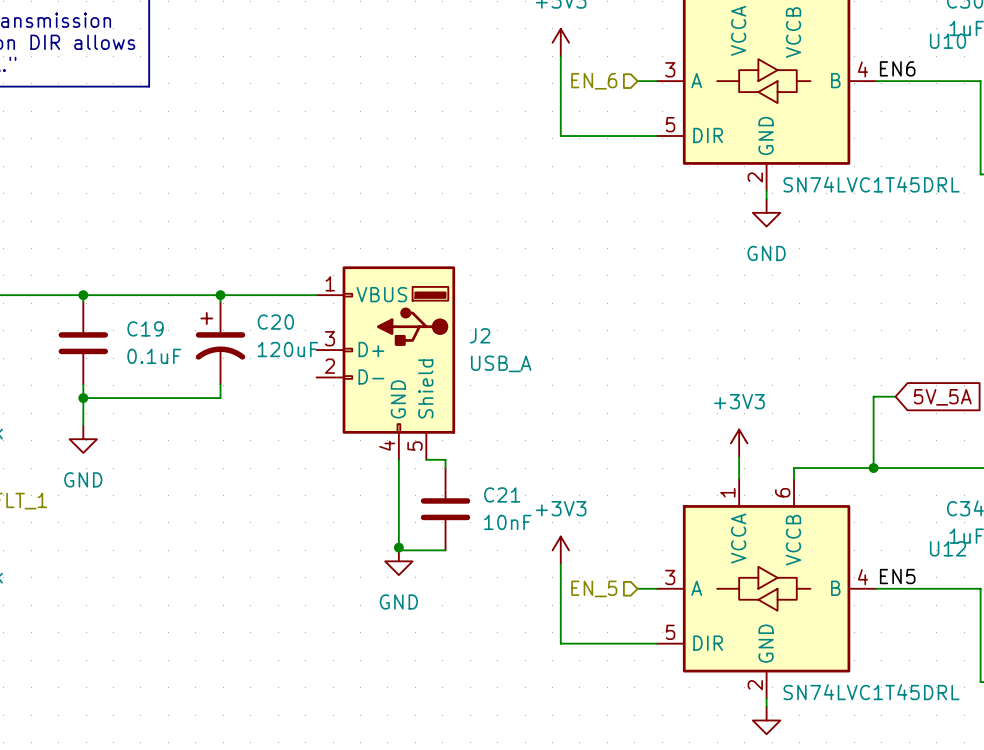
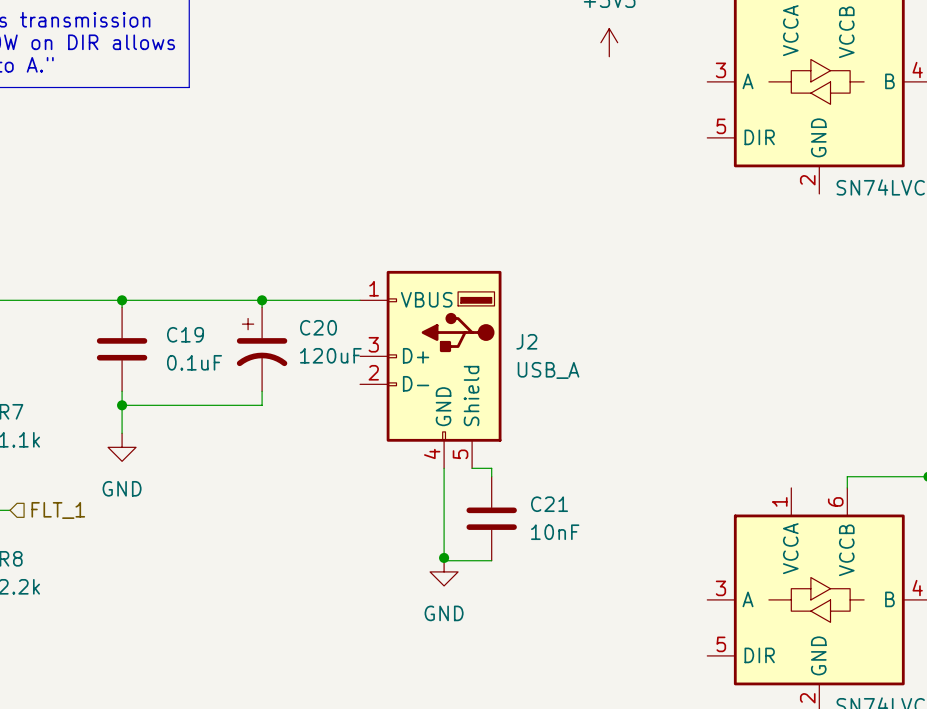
wire: (560, 56) (560, 136) (656, 136) -> none
hierarchical label: EN_6 (594, 81) -> none
wire: (637, 81) (656, 81) -> none
wire: (766, 190) (766, 199) -> none
power symbol: GND (766, 212) -> none
power symbol: +3V3 (739, 443) -> none
wire: (739, 457) (739, 479) -> none
power symbol: +3V3 (560, 550) -> none
wire: (560, 564) (560, 643) (656, 643) -> none
hierarchical label: EN_5 (594, 588) -> none
wire: (637, 588) (656, 588) -> none

